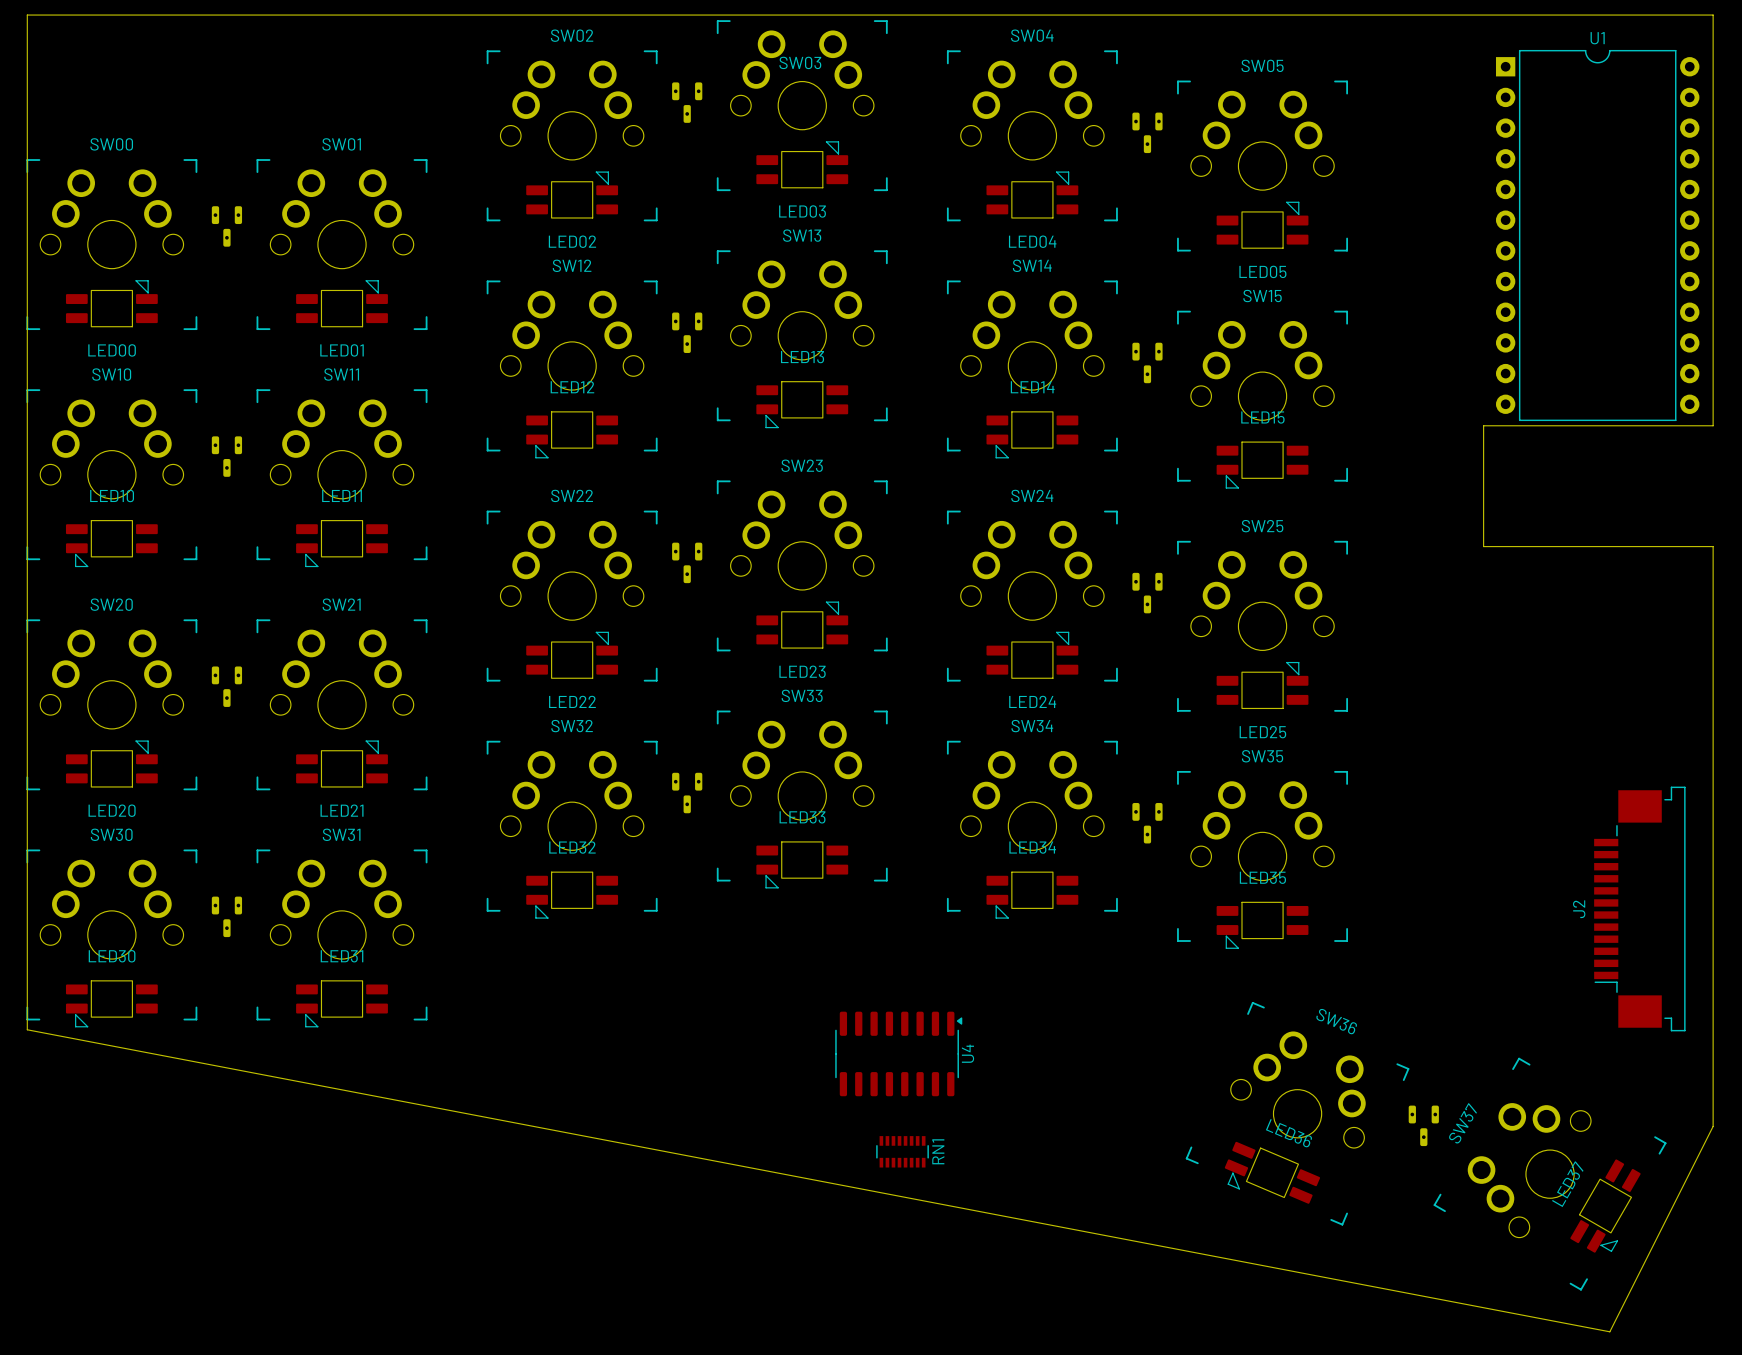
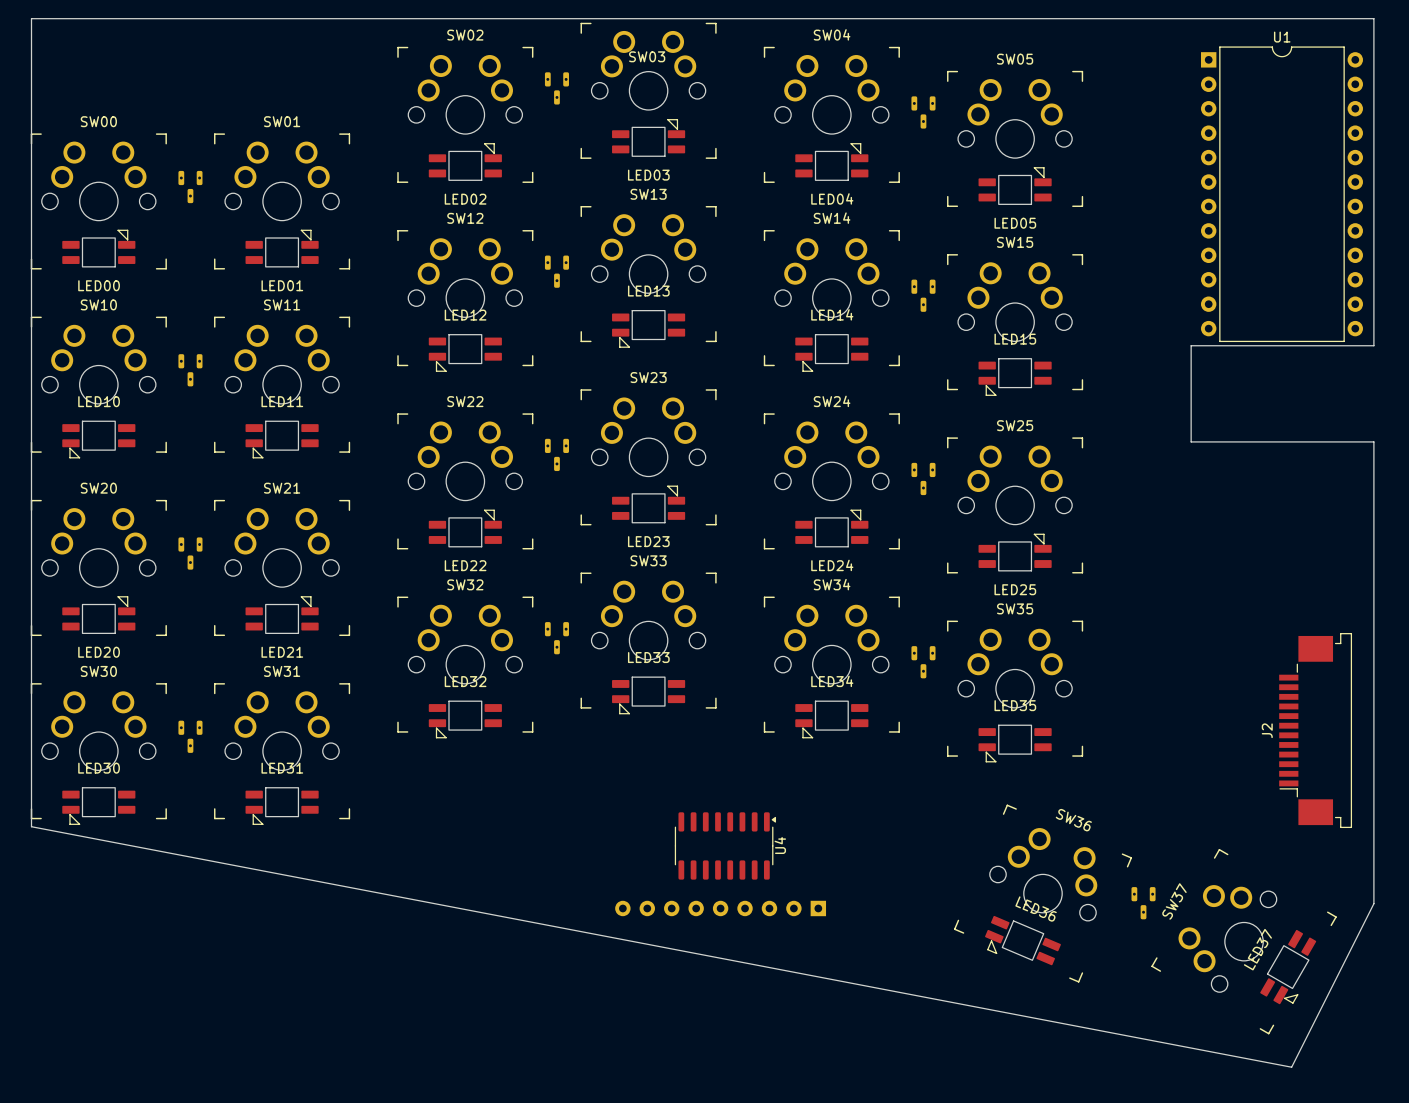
part: none -> (720, 908)
RN1: (902, 1151) -> none

